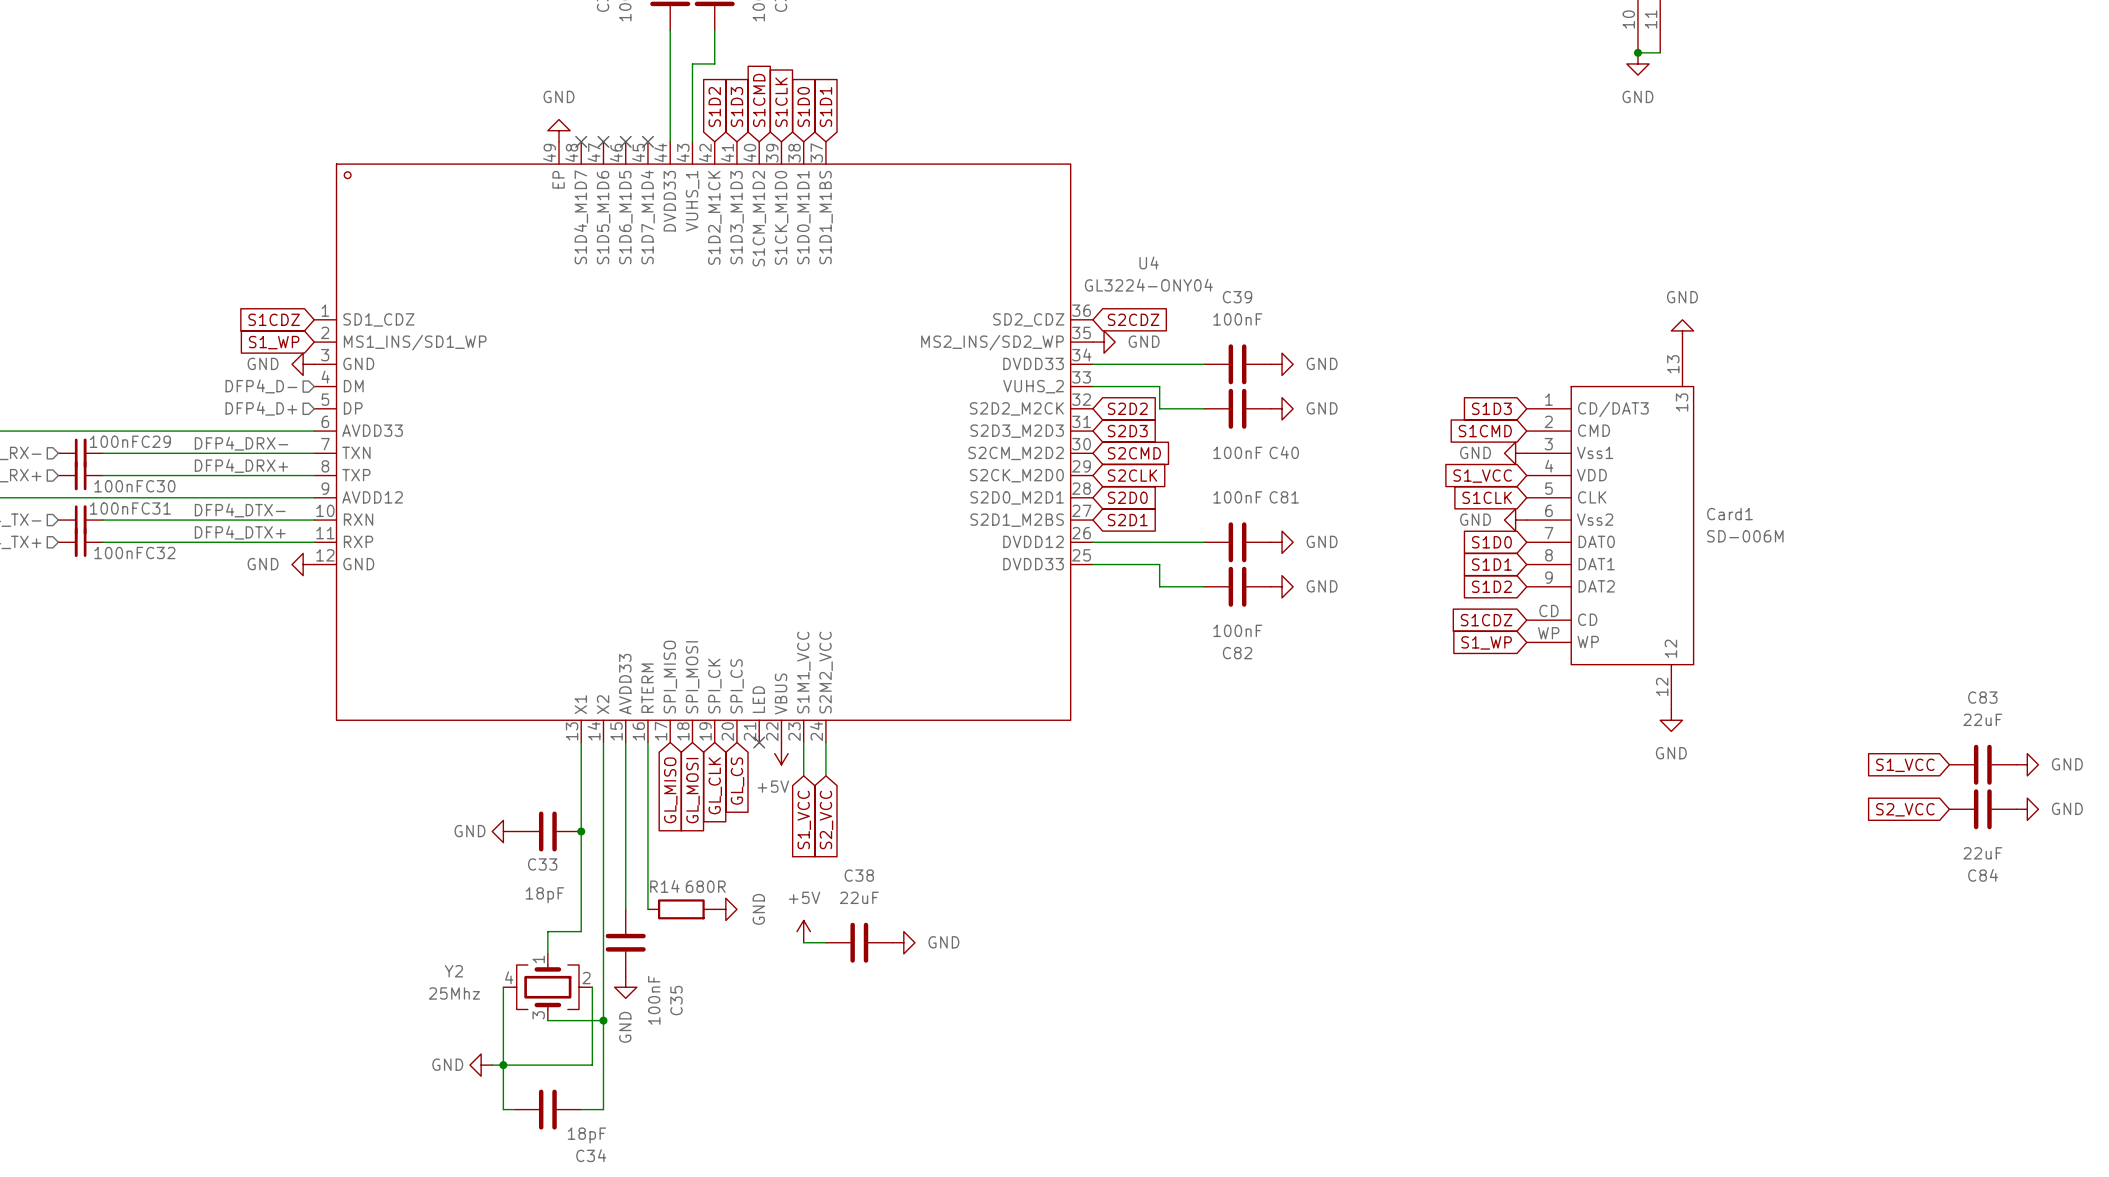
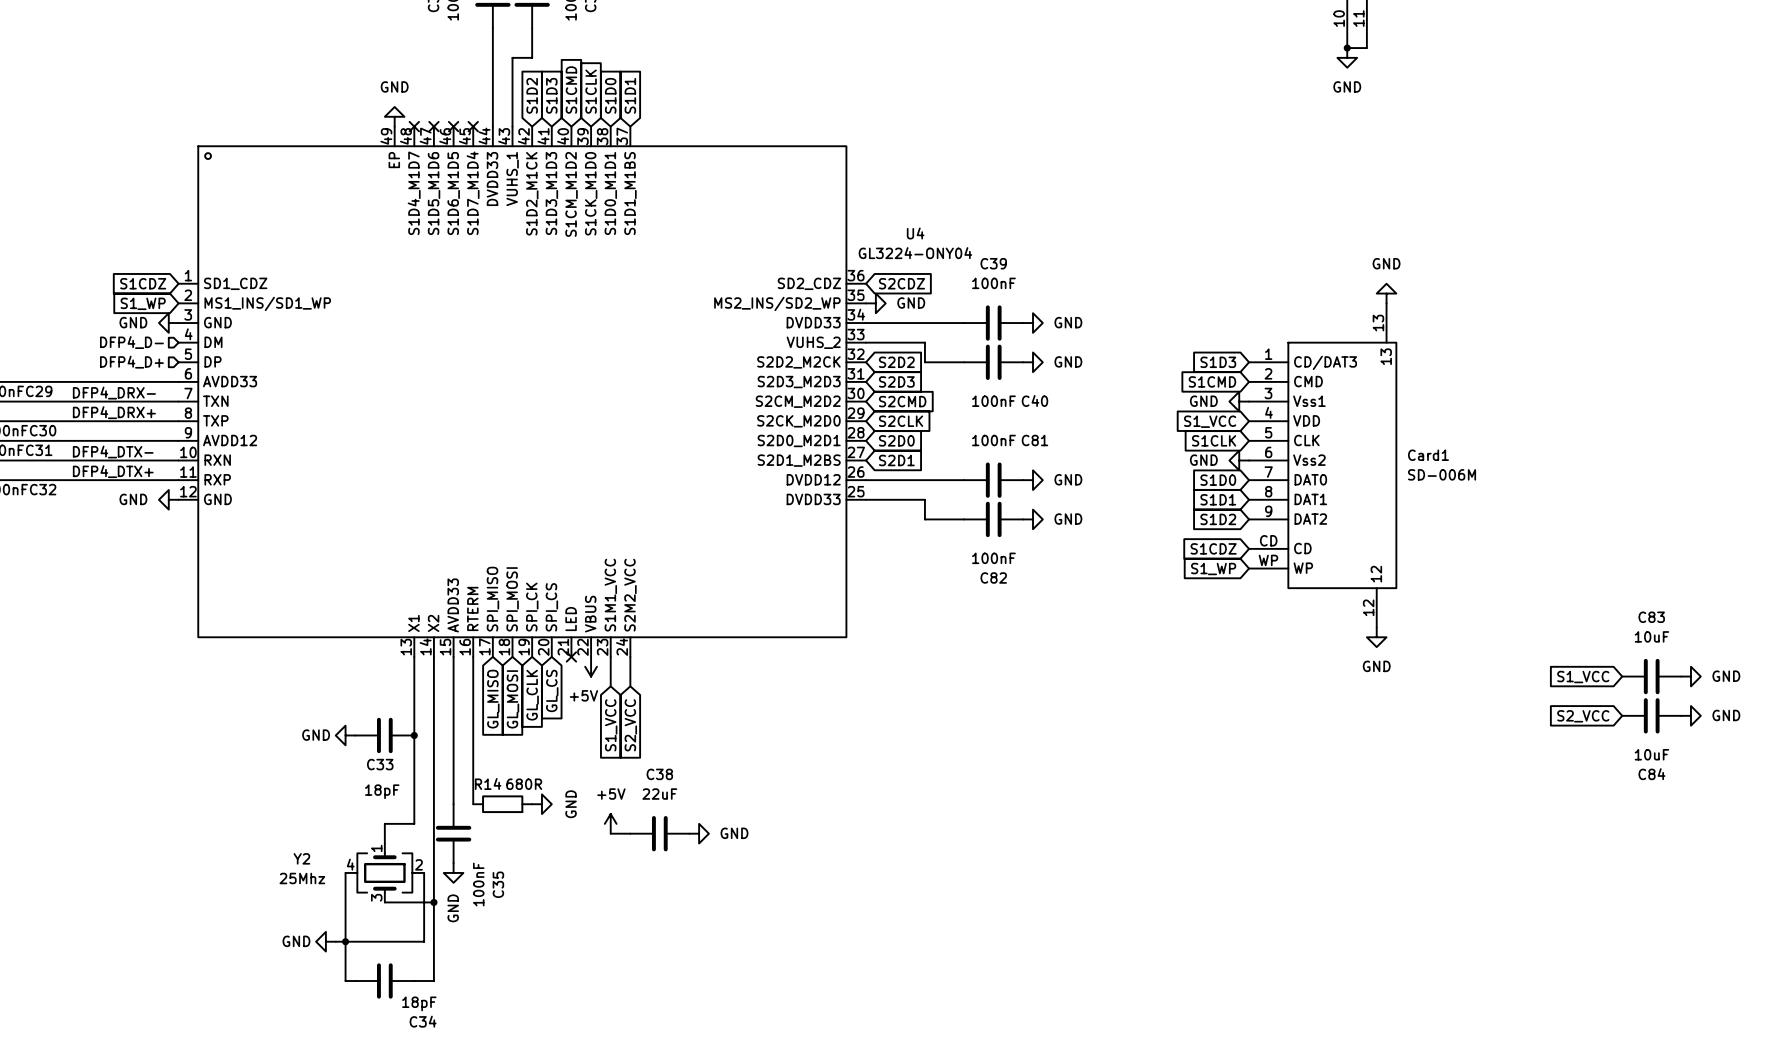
C83 value: 22uF (1982, 719) -> 10uF (1651, 636)
C84 value: 22uF (1982, 853) -> 10uF (1651, 754)

